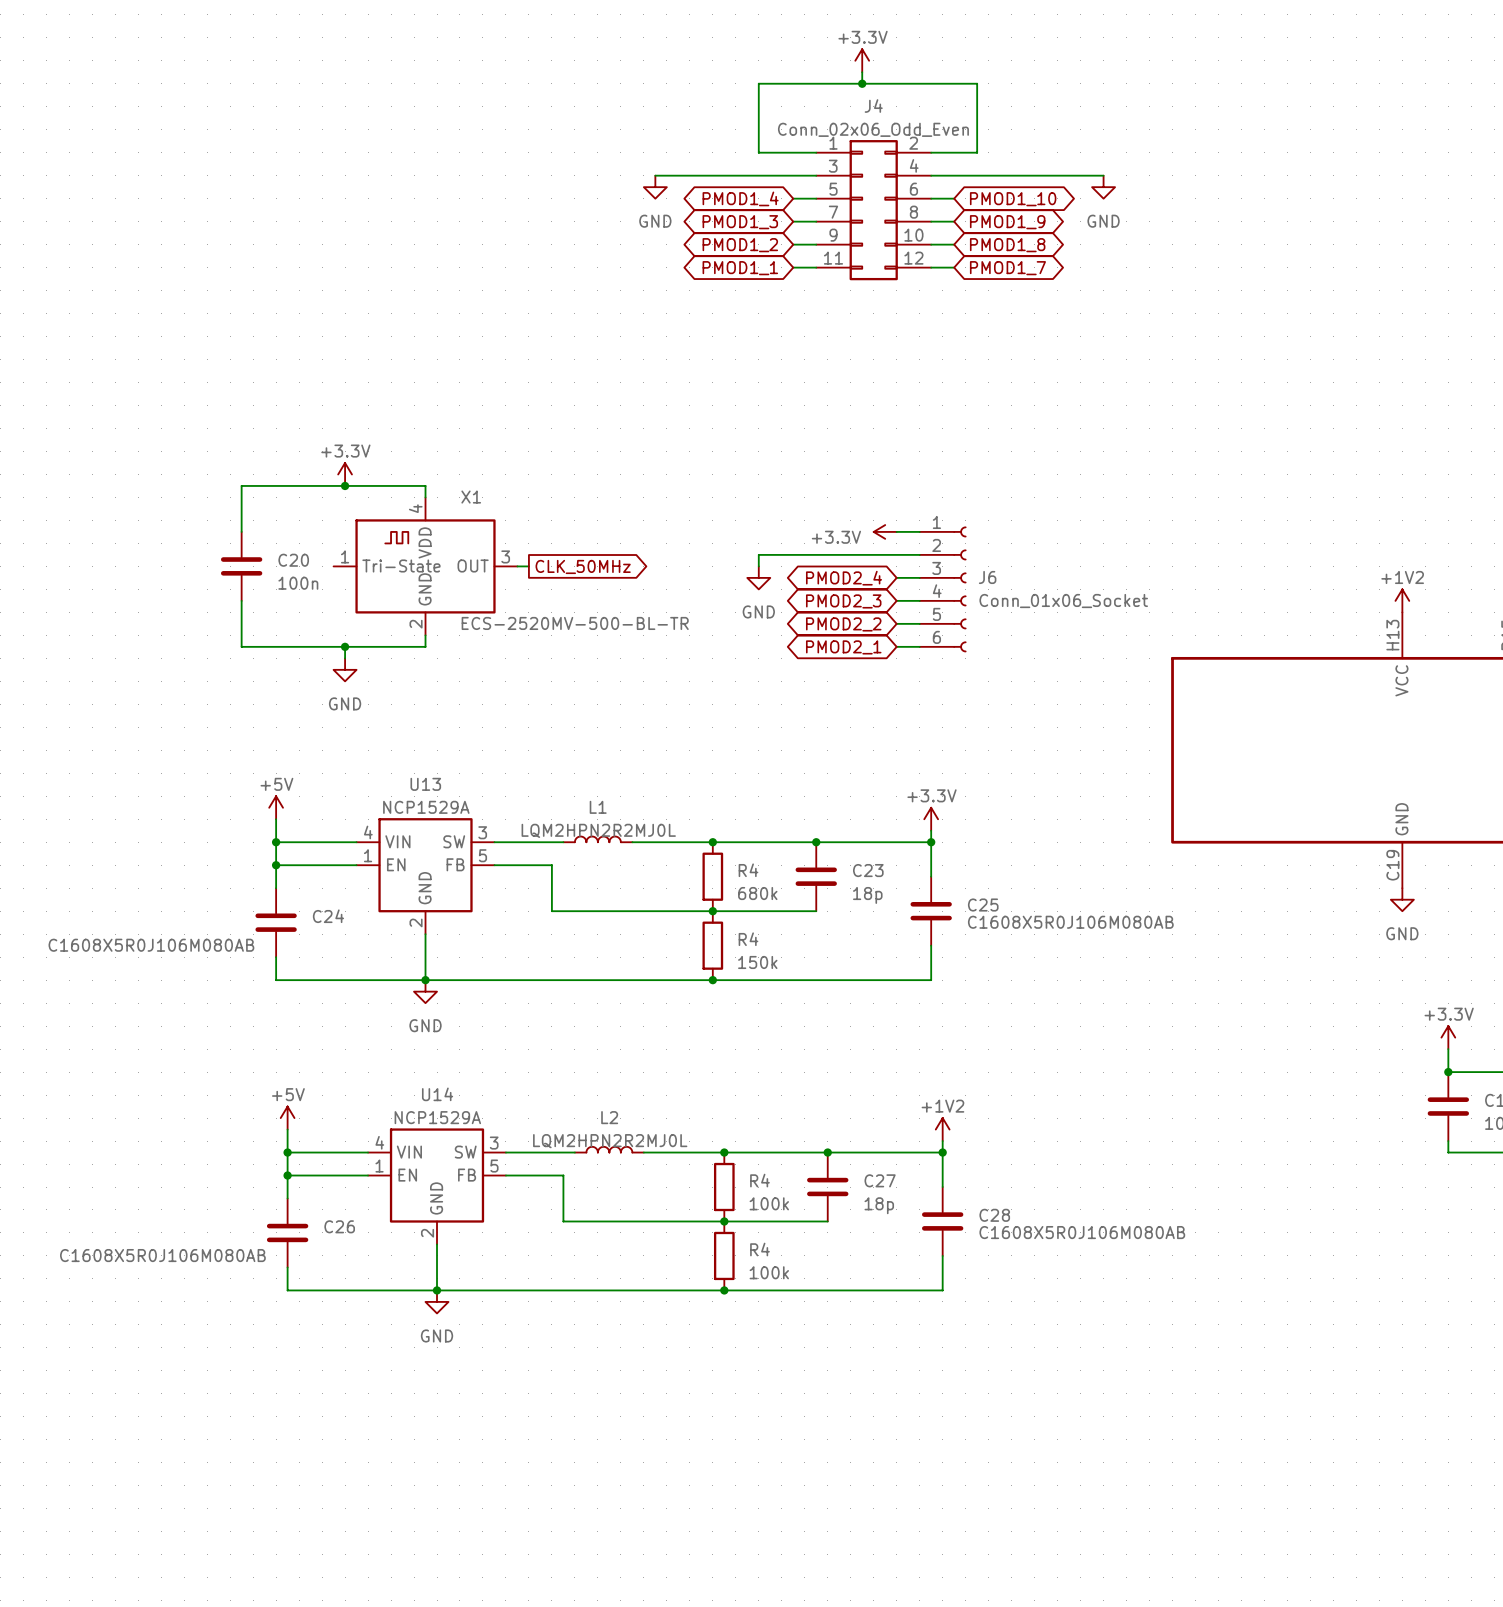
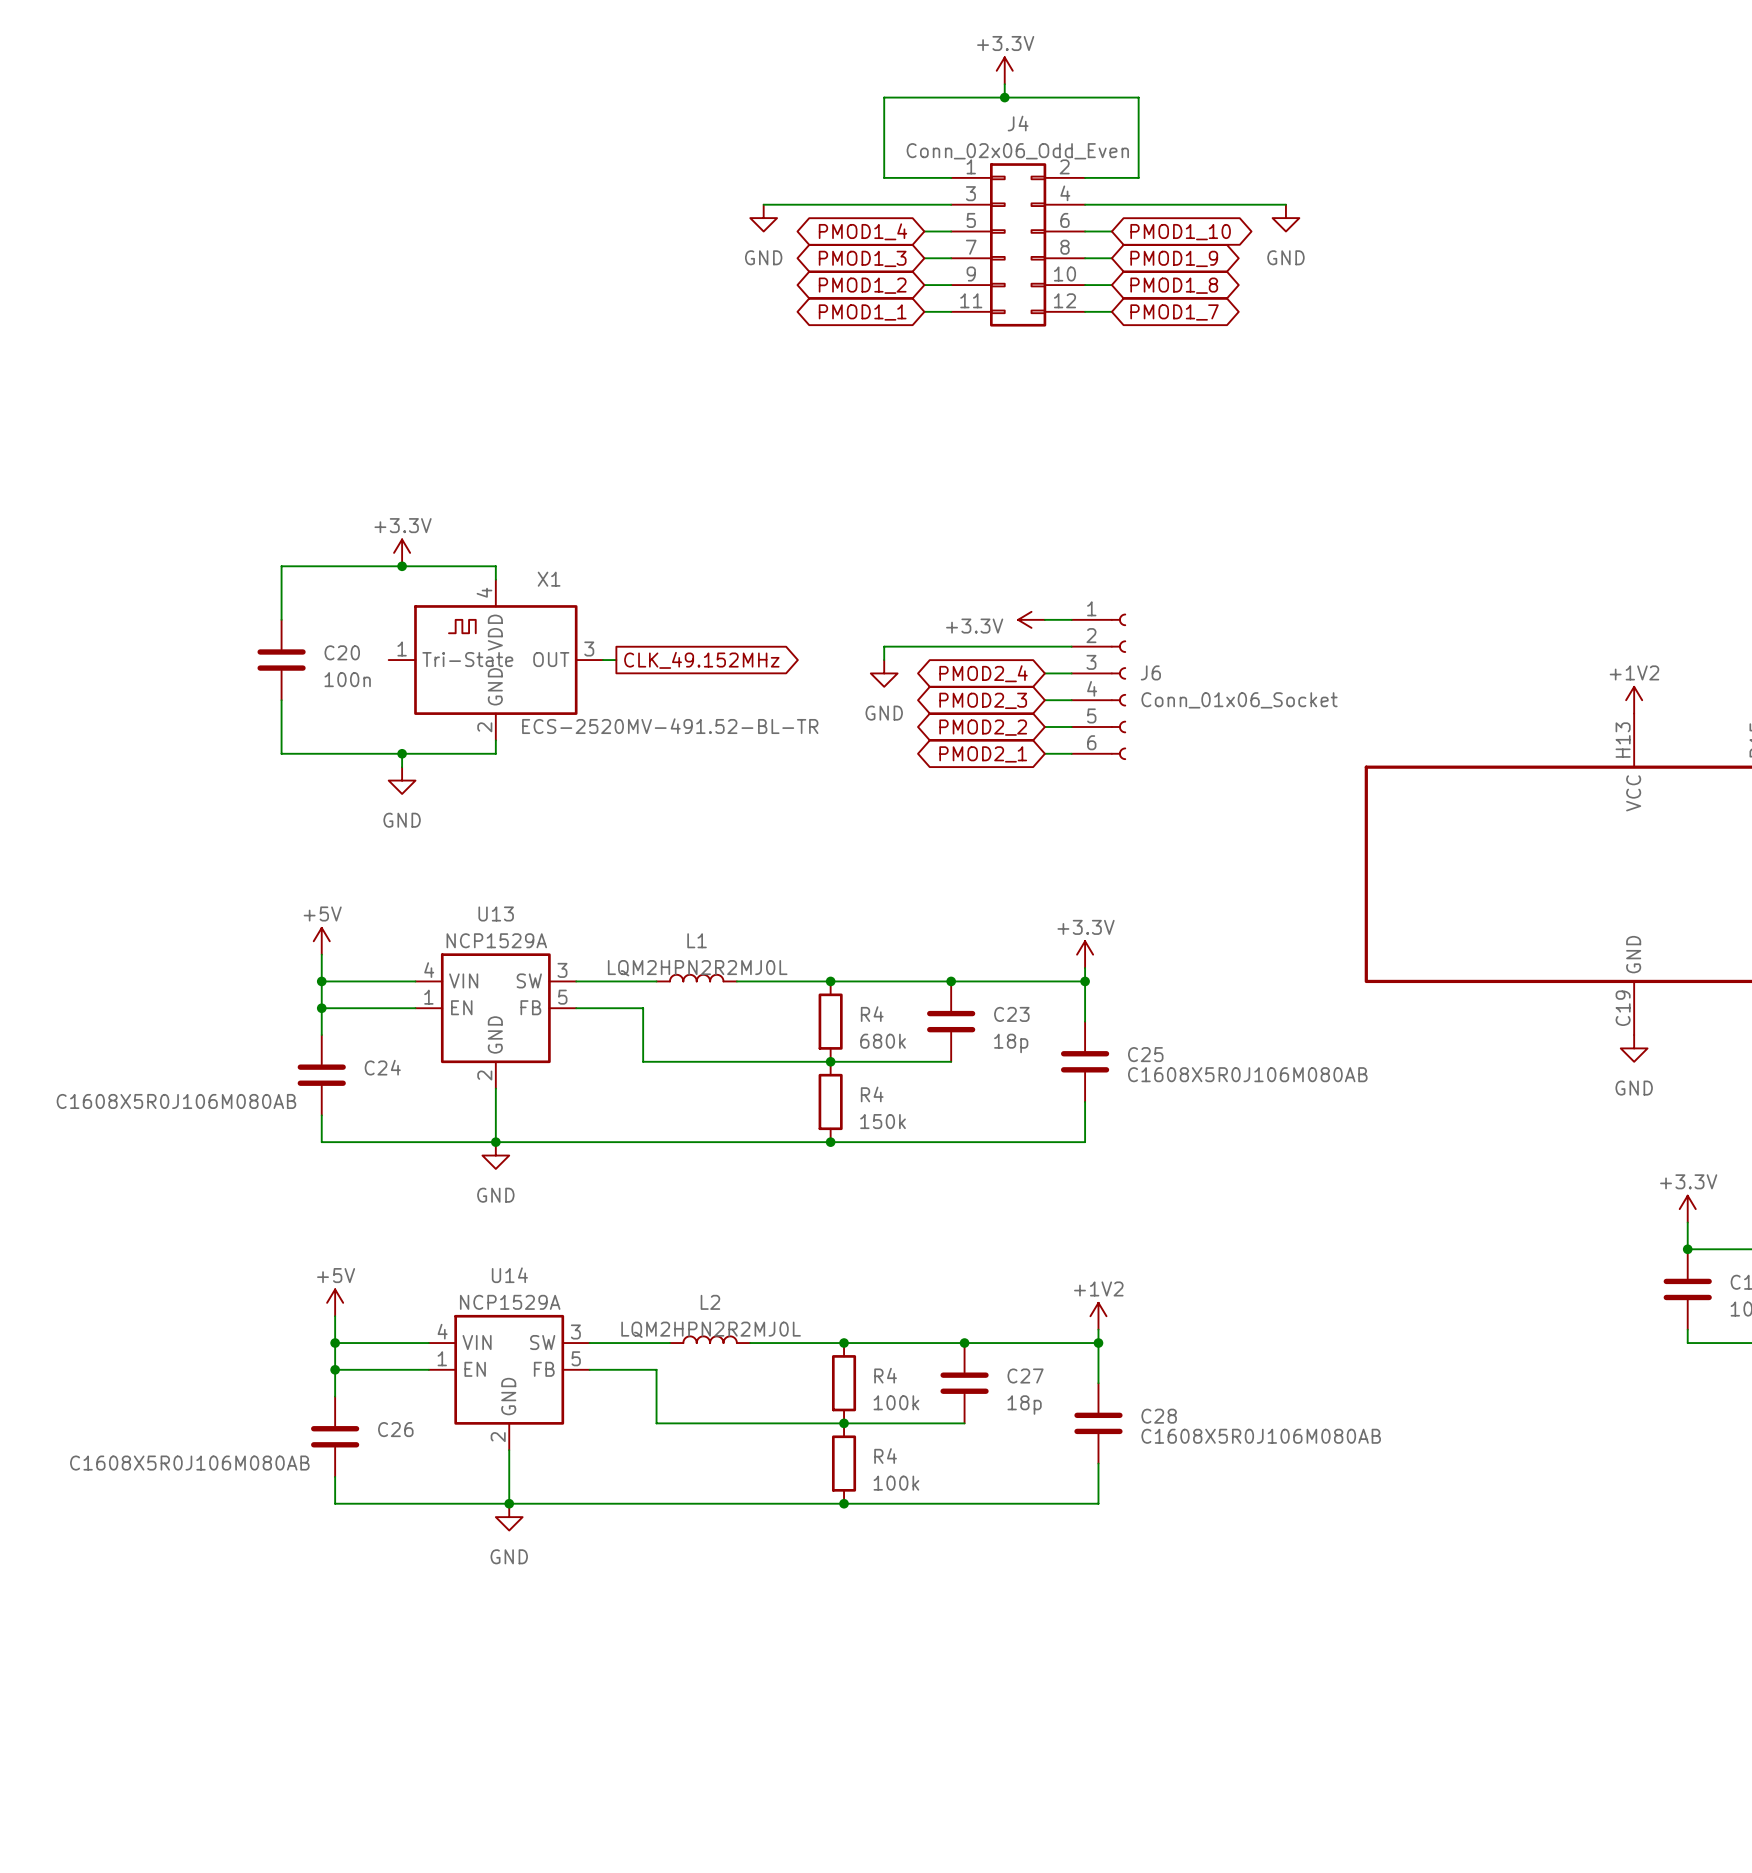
global label: CLK_50MHz (583, 566) -> CLK_49.152MHz (701, 660)
X1 value: ECS-2520MV-500-BL-TR (575, 623) -> ECS-2520MV-491.52-BL-TR (670, 726)

